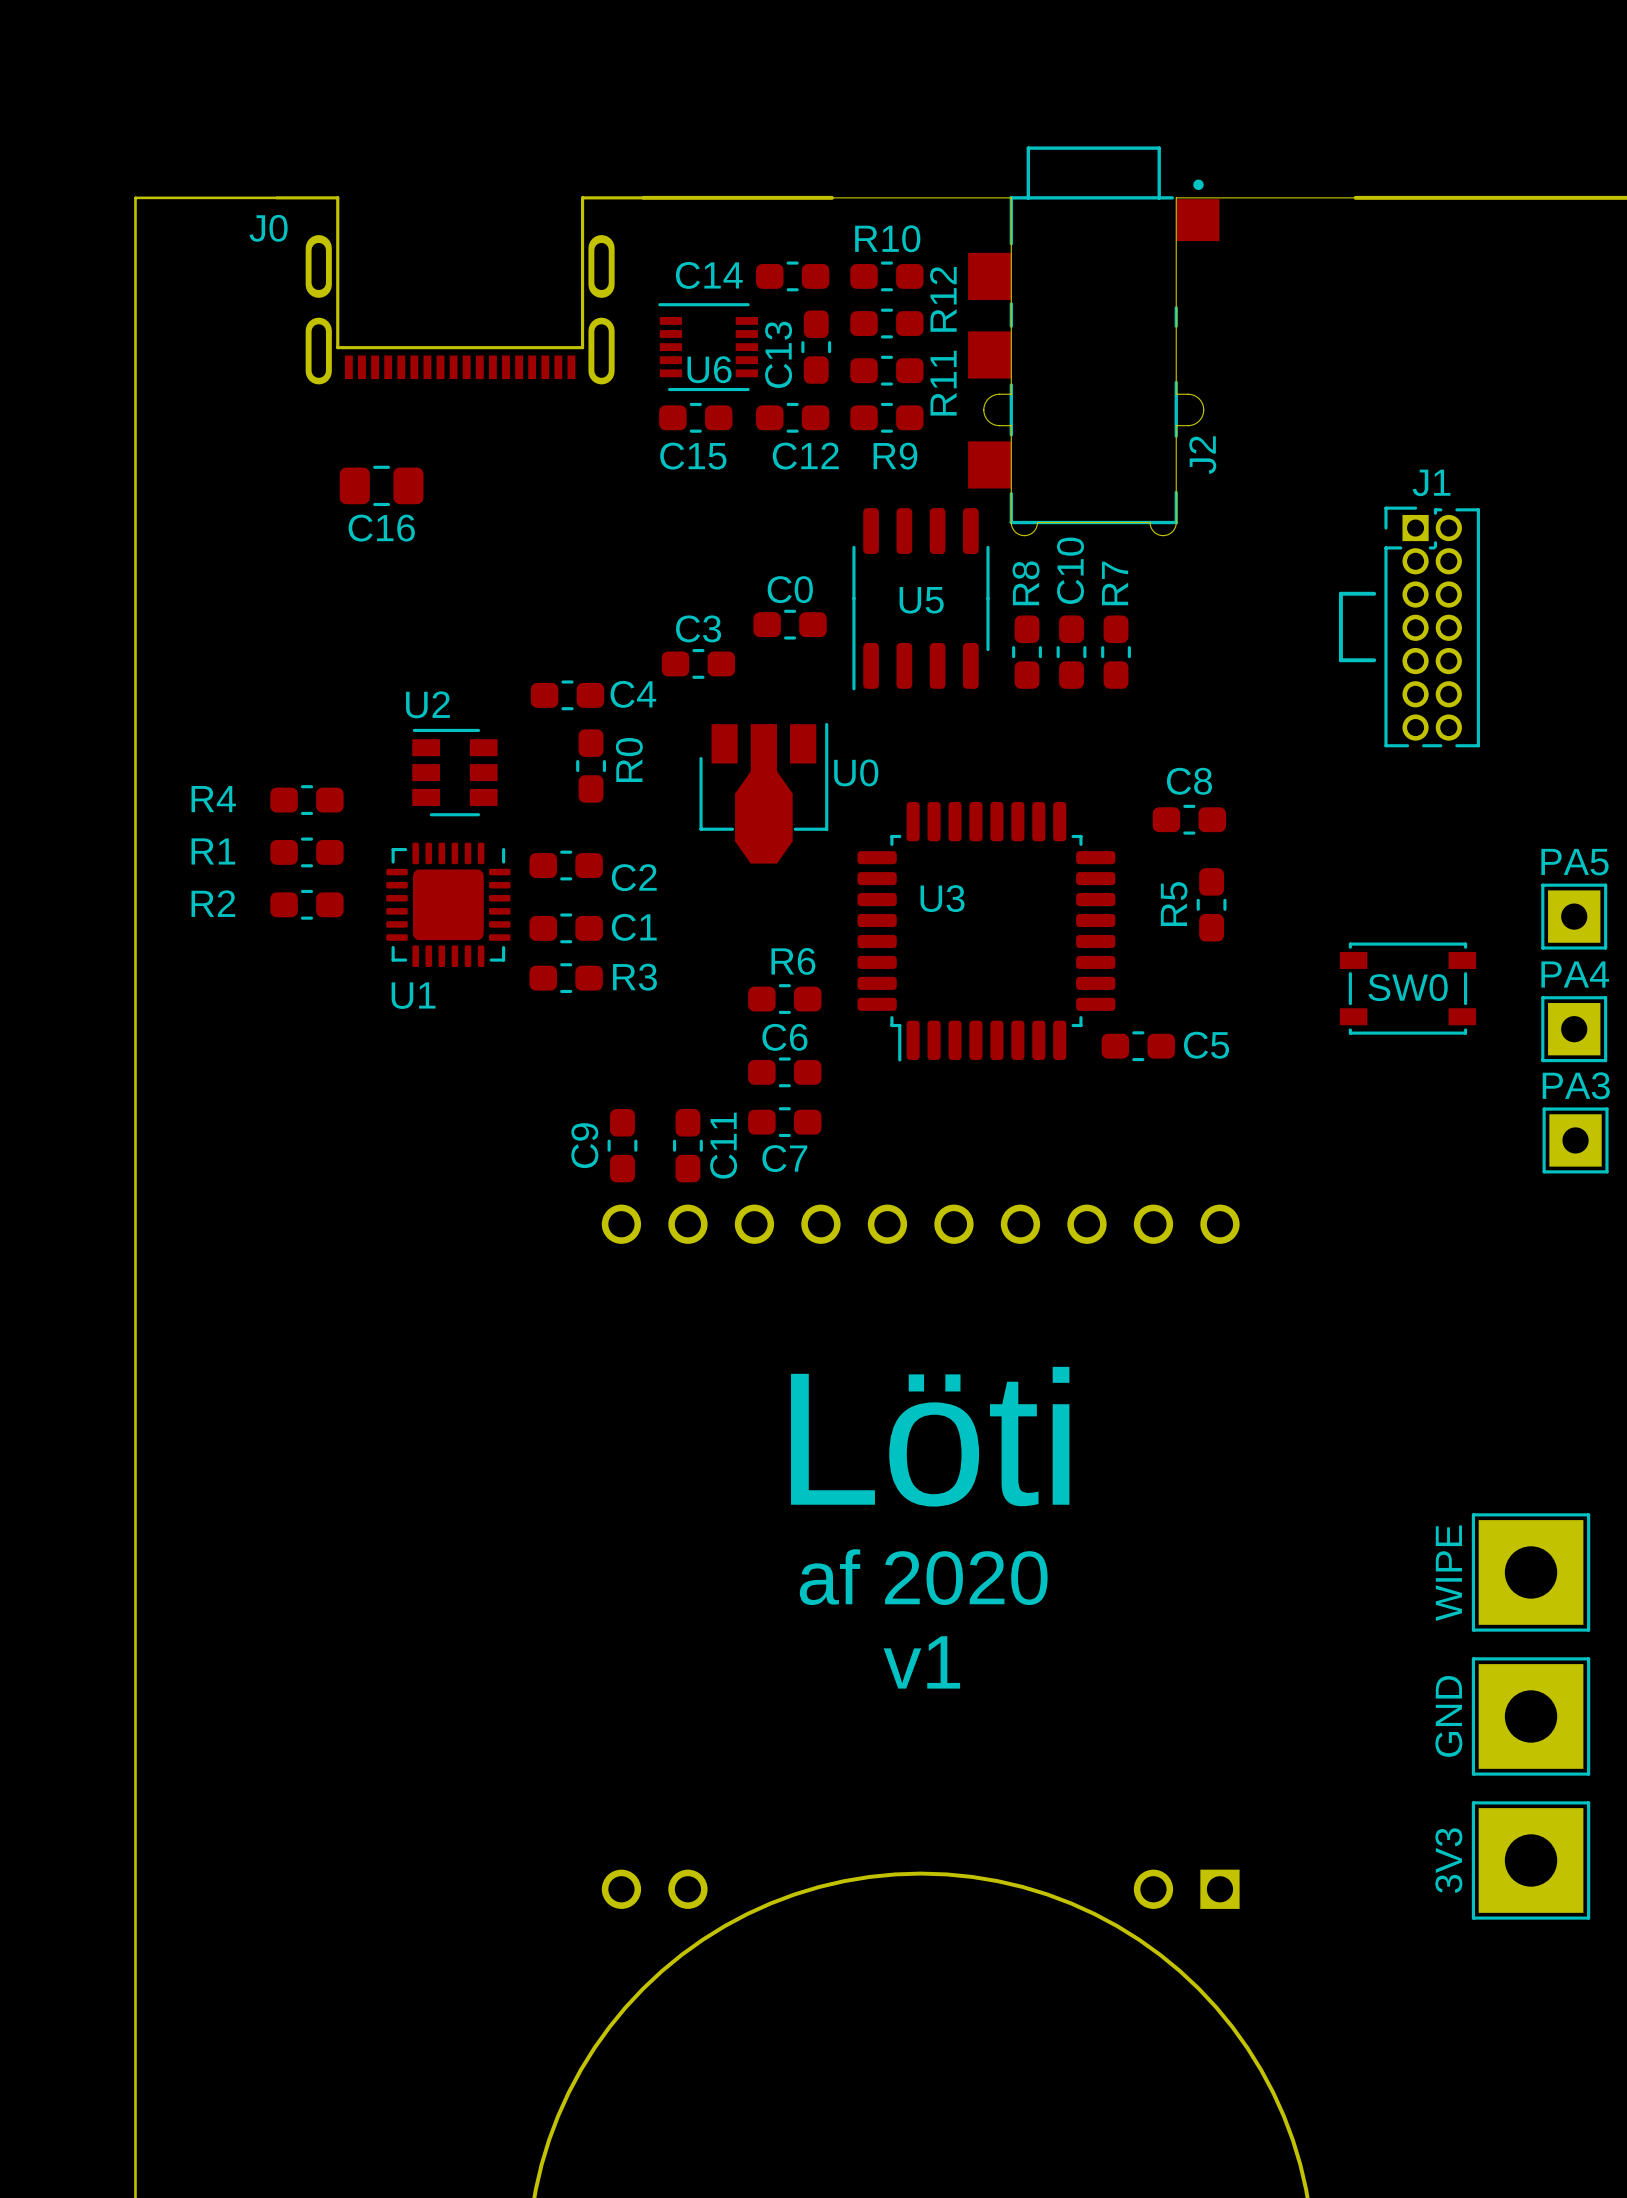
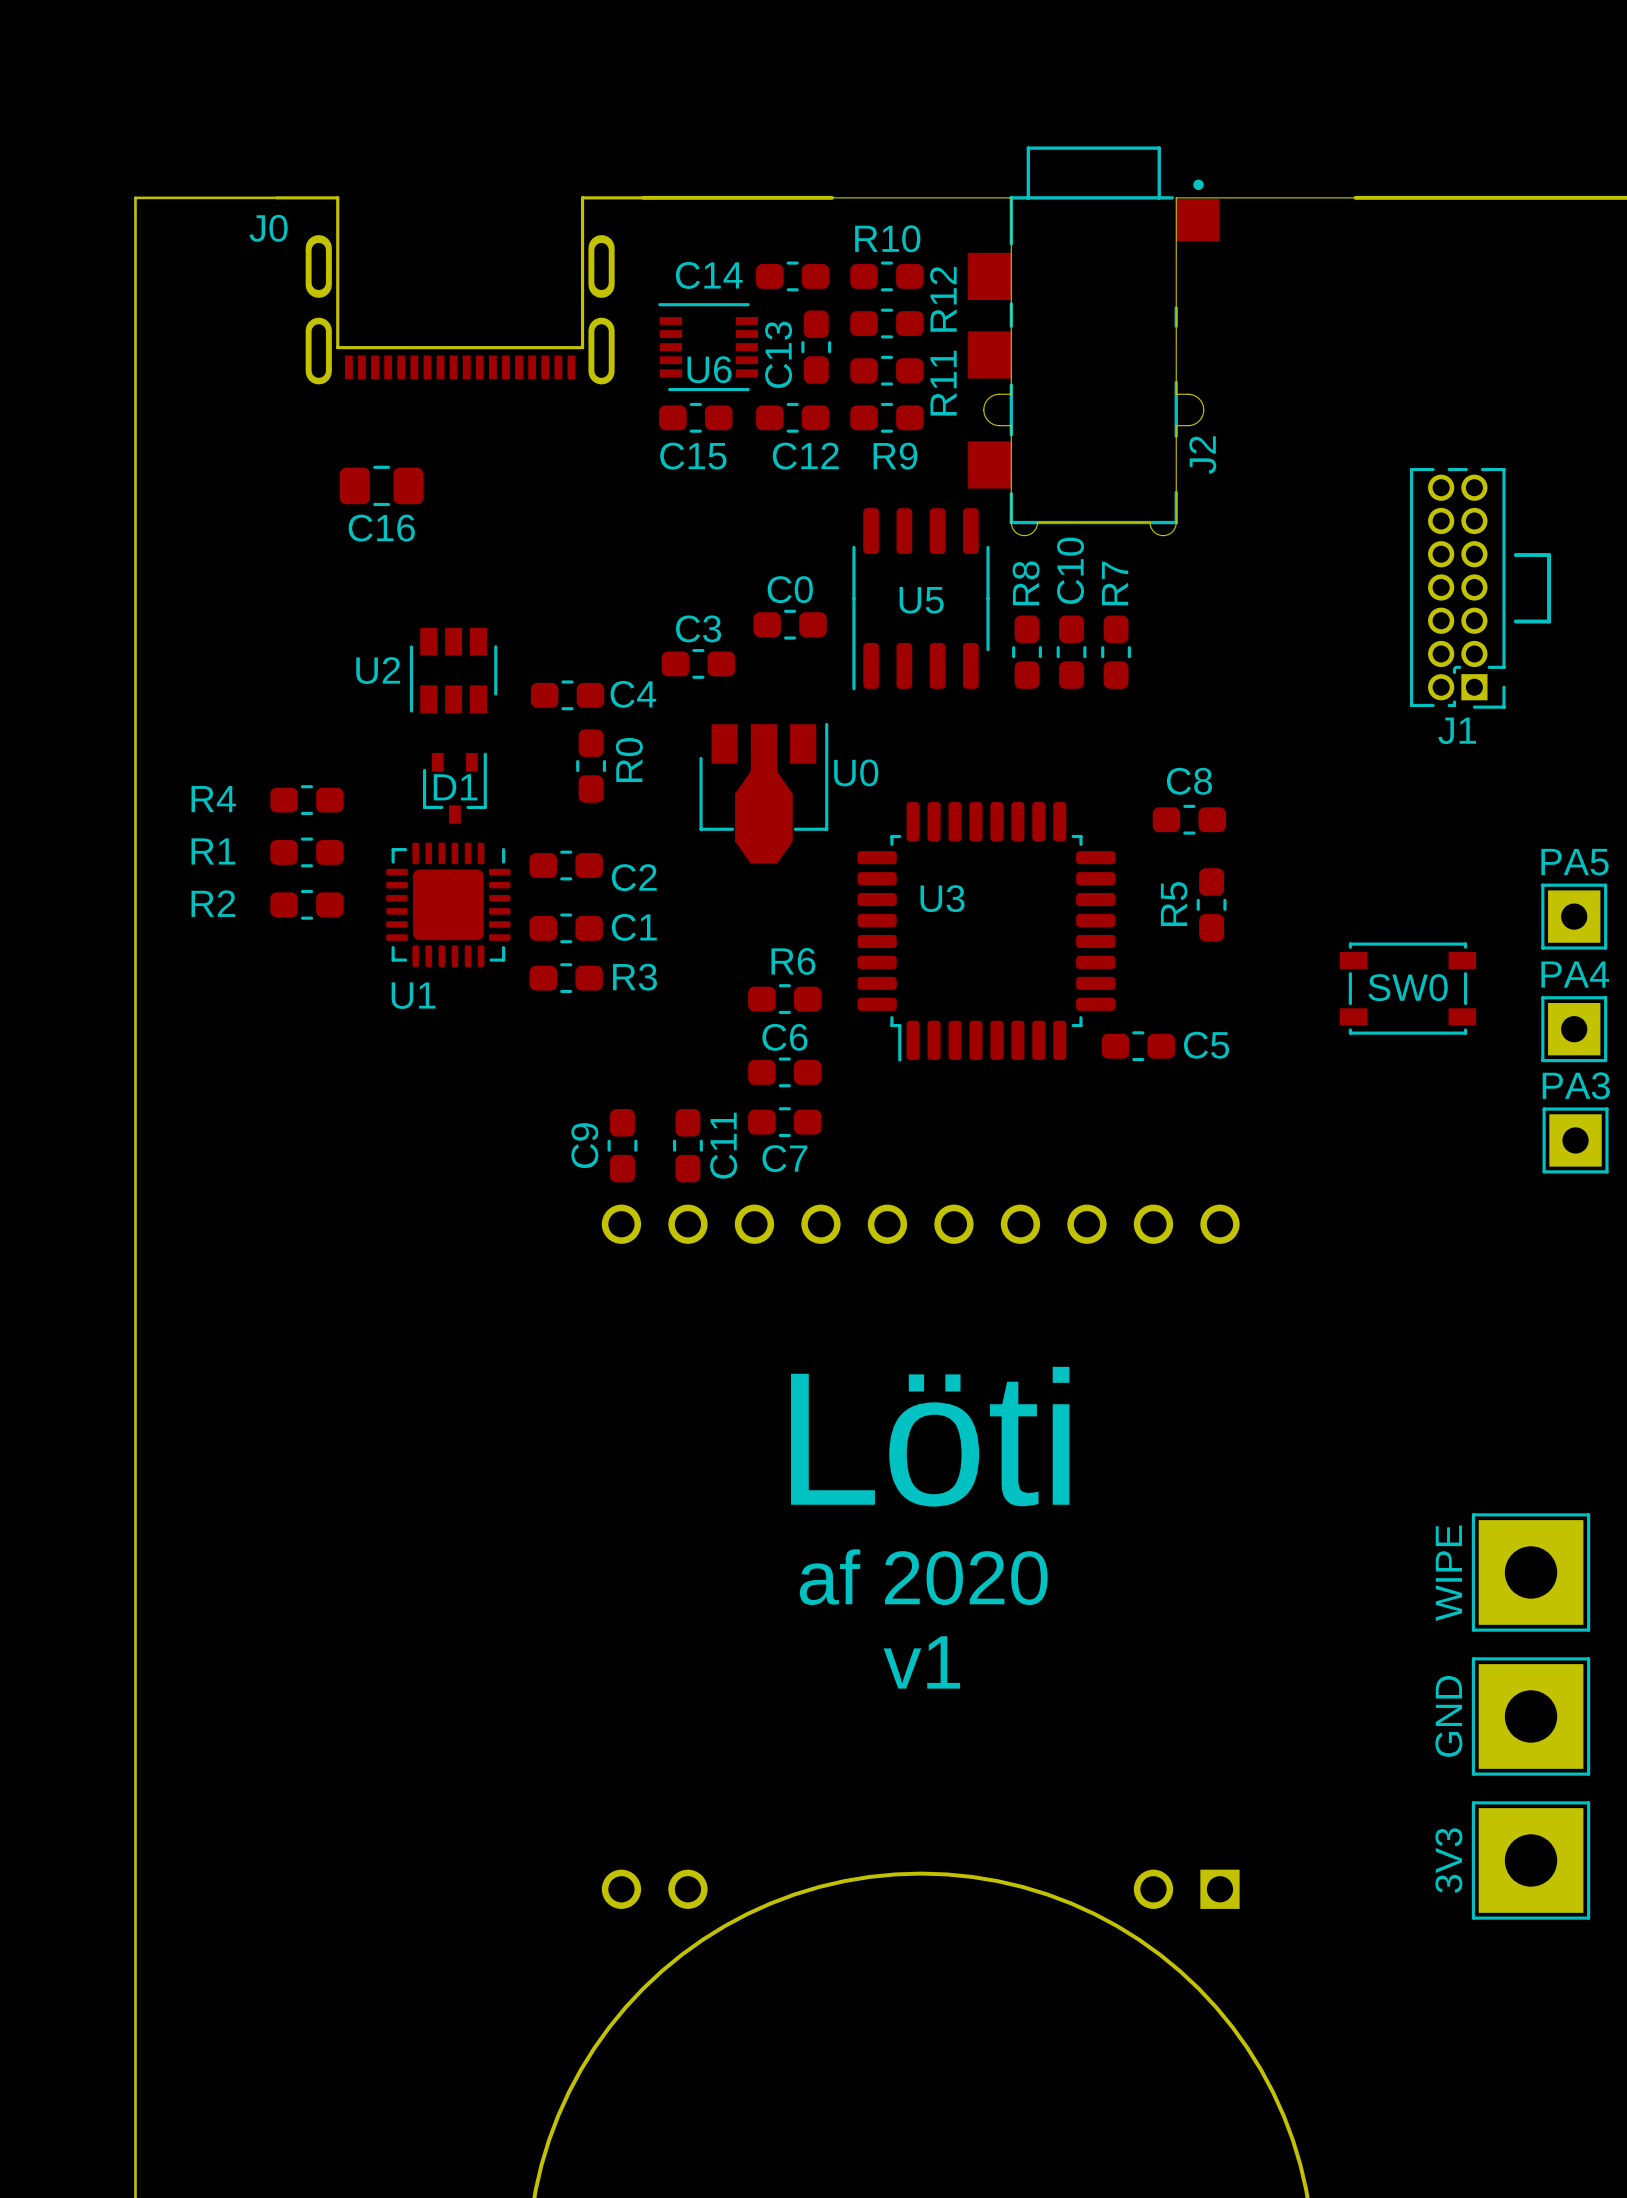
line: none -> (1515, 555) (1549, 555) (1549, 621) (1515, 621)
line: (1374, 593) (1340, 593) (1340, 660) (1374, 660) -> none
J1 rotation: 0° (1432, 626) -> 180° (1457, 588)
U2 rotation: 0° (454, 772) -> 90° counterclockwise (453, 670)
U2 position: (454, 772) -> (453, 670)
D1: none -> (454, 788)

